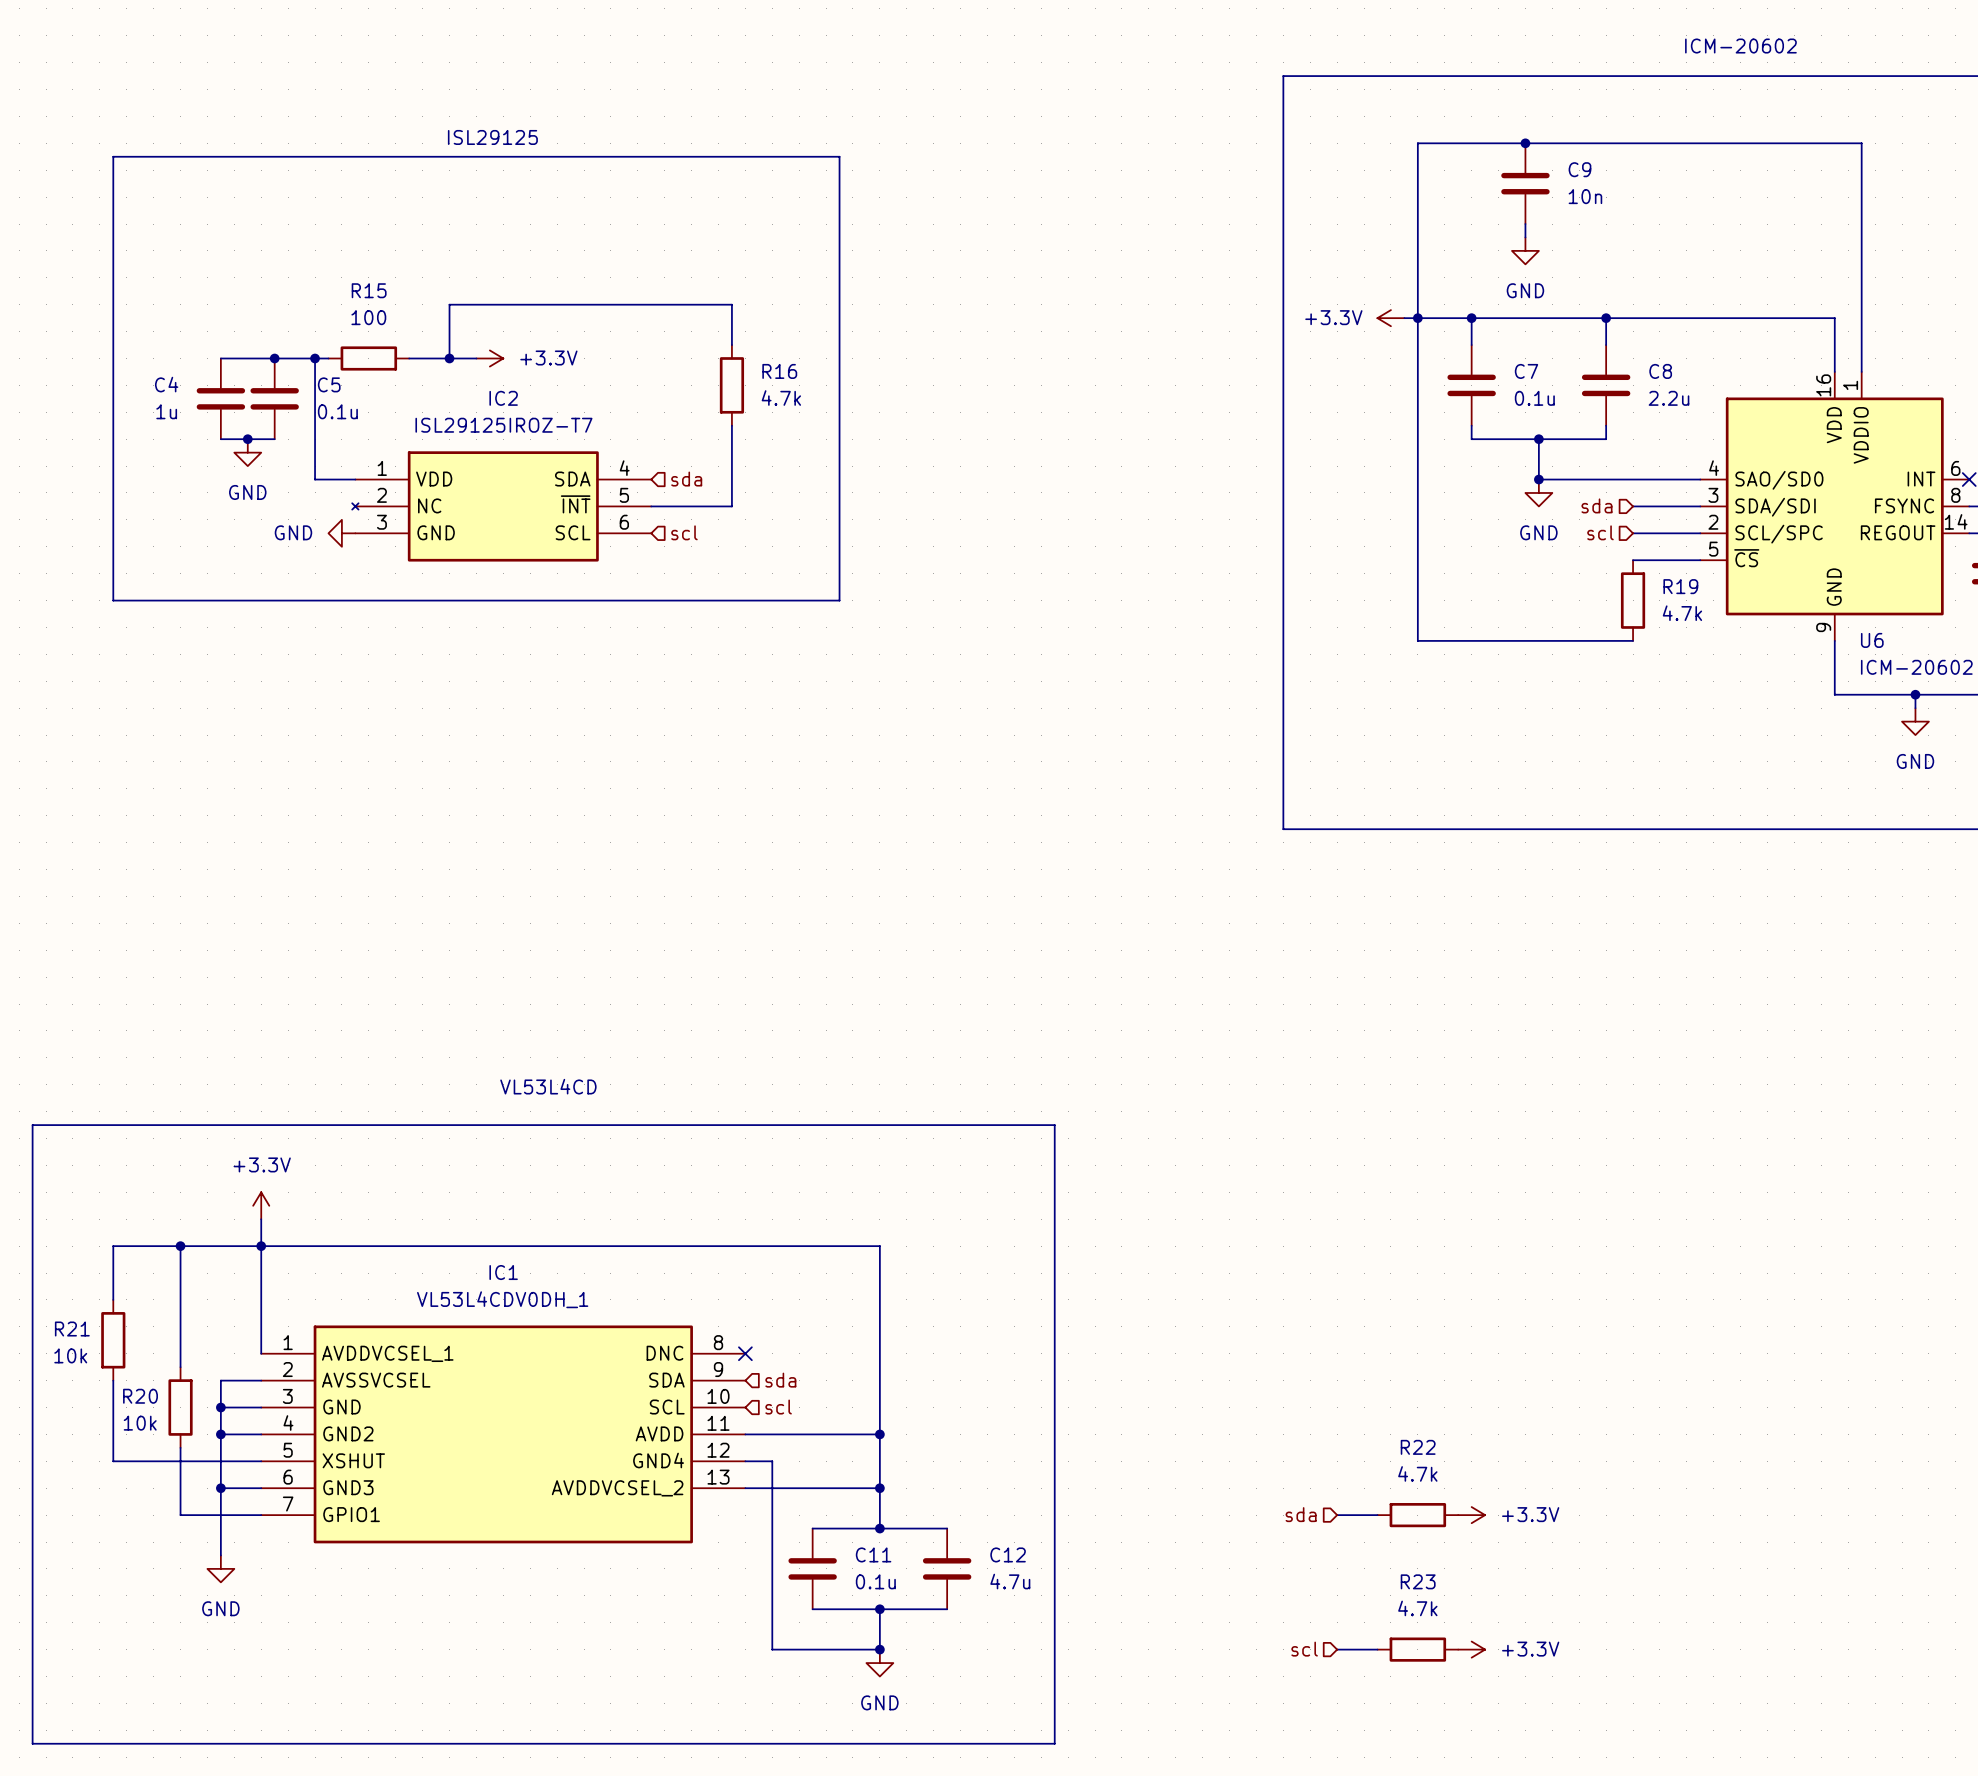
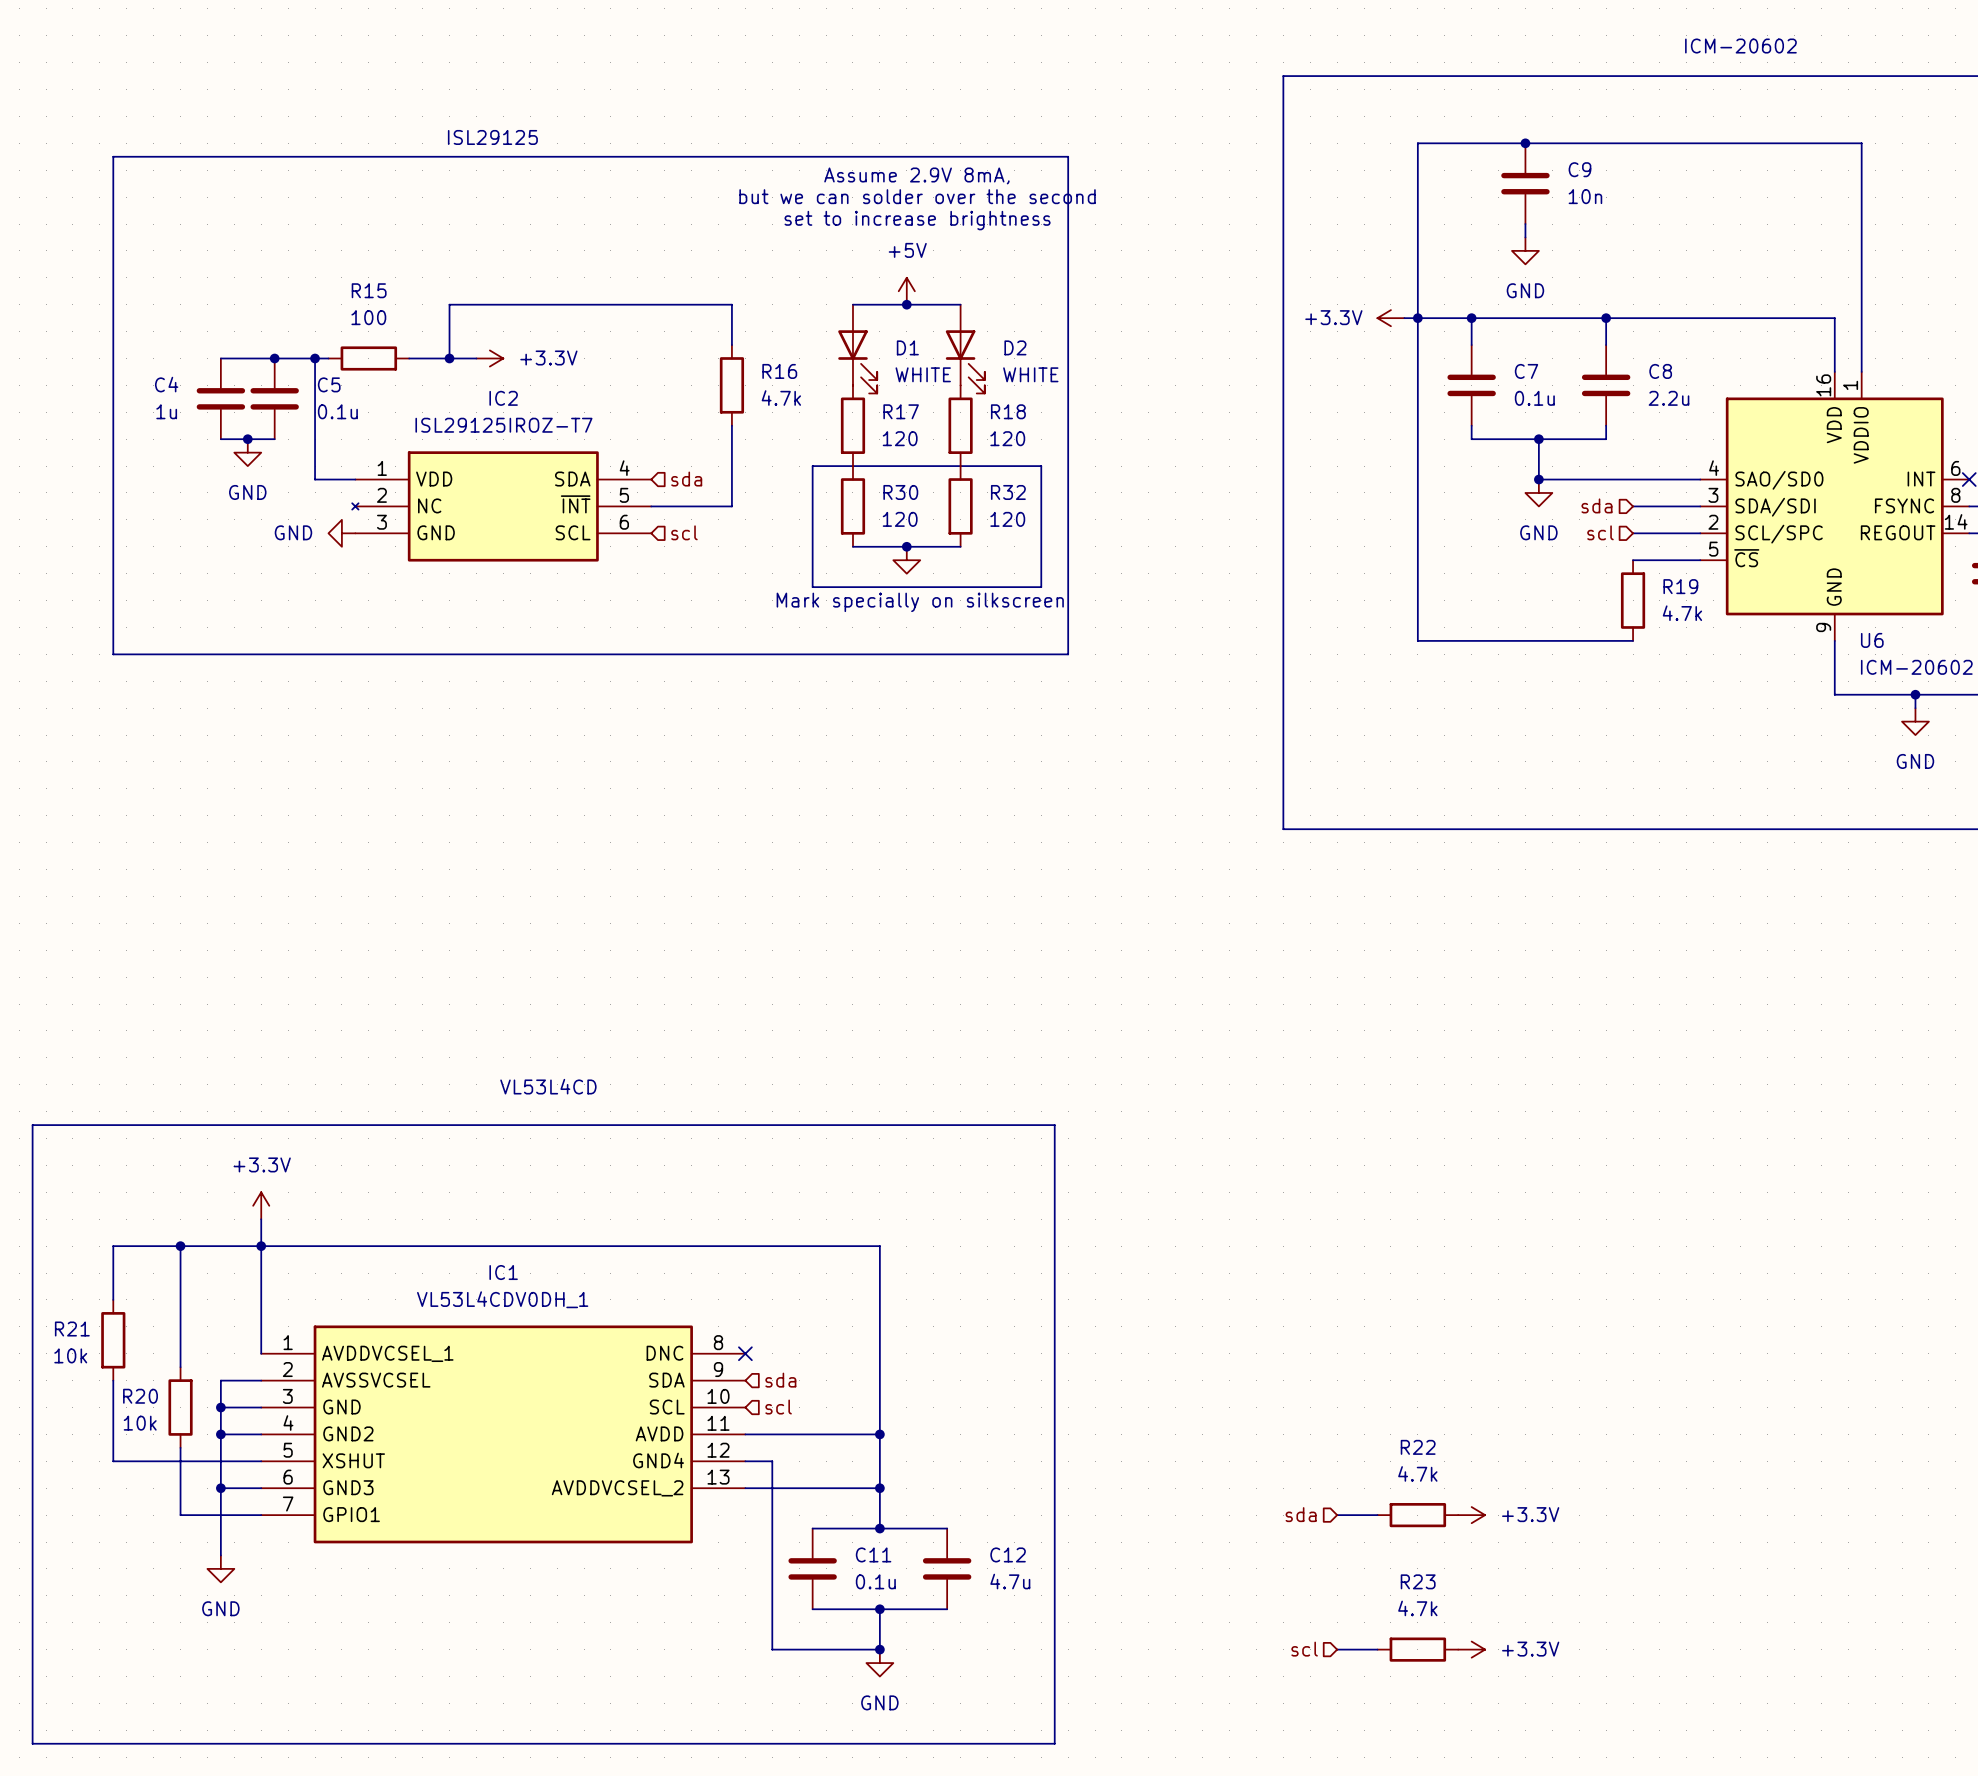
line: (839, 156) (839, 600) (113, 600) -> (839, 156) (1068, 156) (1068, 654) (113, 654) (113, 600)
text: none -> Assume 2.9V 8mA, (916, 175)
text: none -> but we can solder over the second (917, 196)
text: none -> set to increase brightness (917, 220)
power symbol: none -> +5V (906, 291)
wire: none -> (852, 304) (960, 304)
junction: none -> (906, 304)
D1: none -> WHITE (857, 349)
D2: none -> WHITE (965, 349)
R17: none -> 120 (852, 425)
R18: none -> 120 (960, 425)
line: none -> (812, 466) (1041, 466) (1041, 587) (812, 587) (812, 466)
R30: none -> 120 (852, 506)
R32: none -> 120 (960, 506)
wire: none -> (852, 546) (960, 546)
junction: none -> (906, 546)
power symbol: none -> (906, 560)
text: none -> Mark specially on silkscreen (920, 602)

